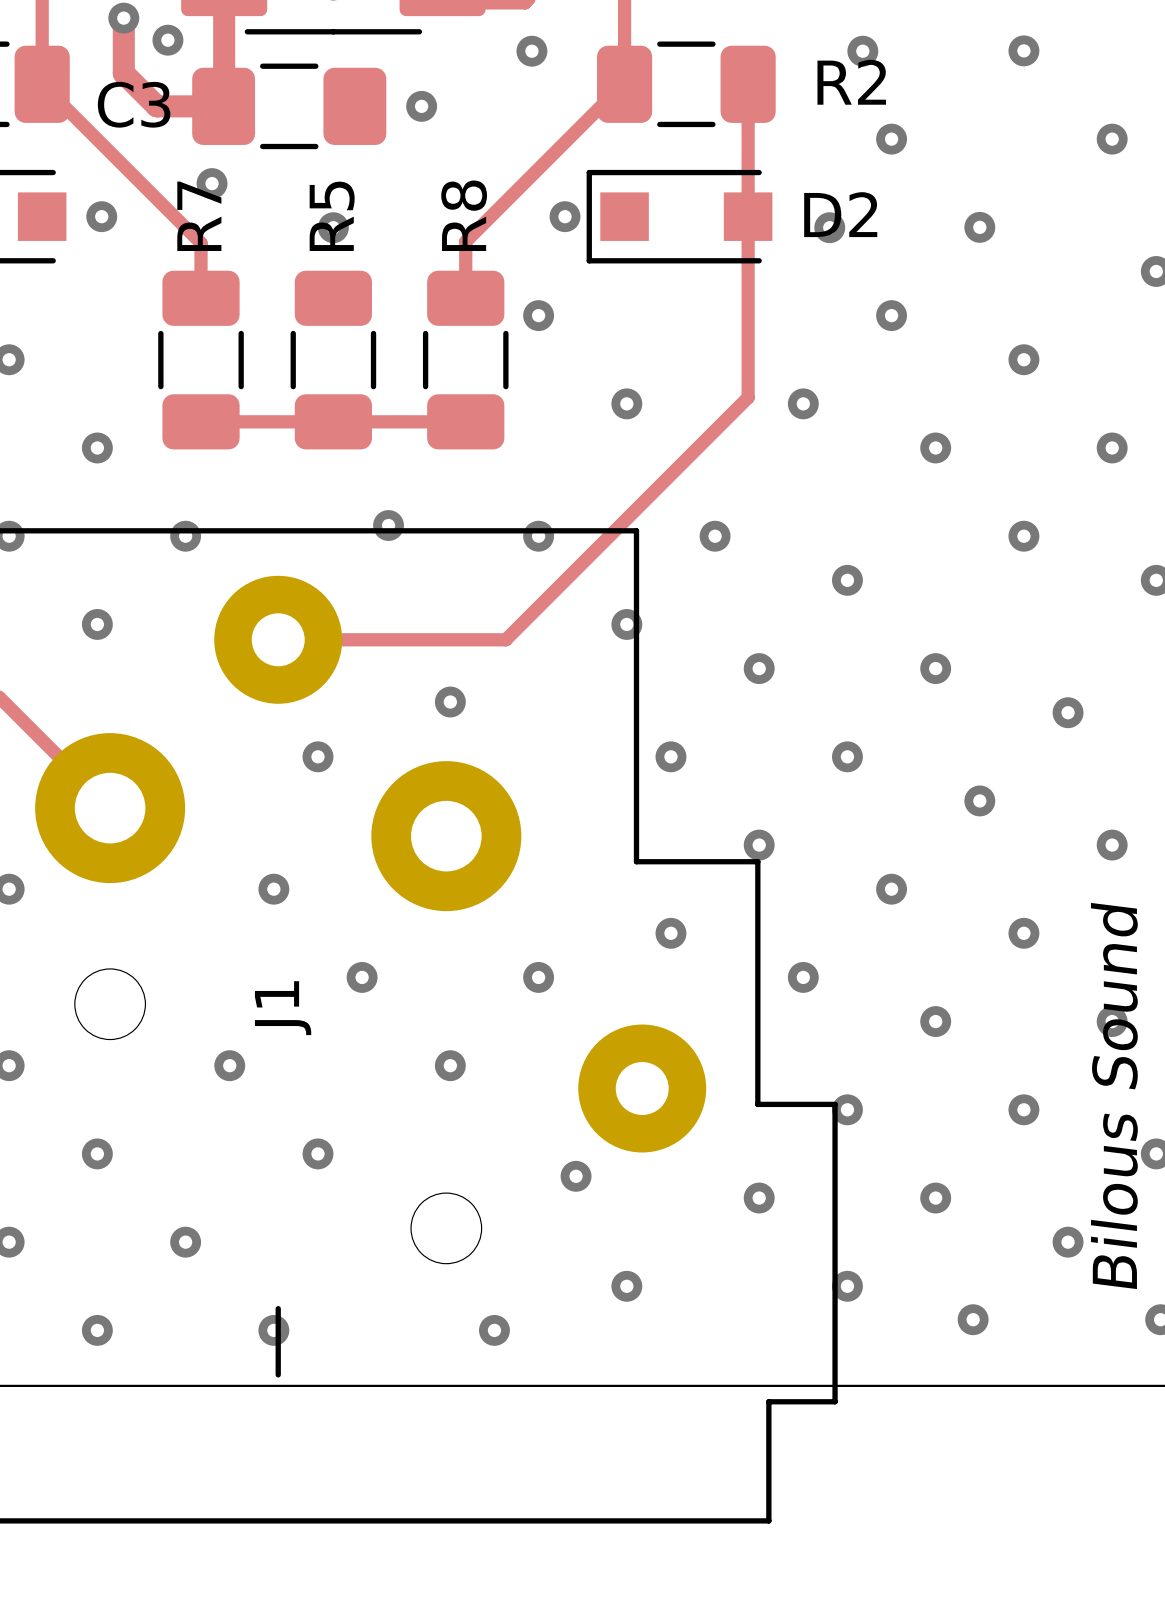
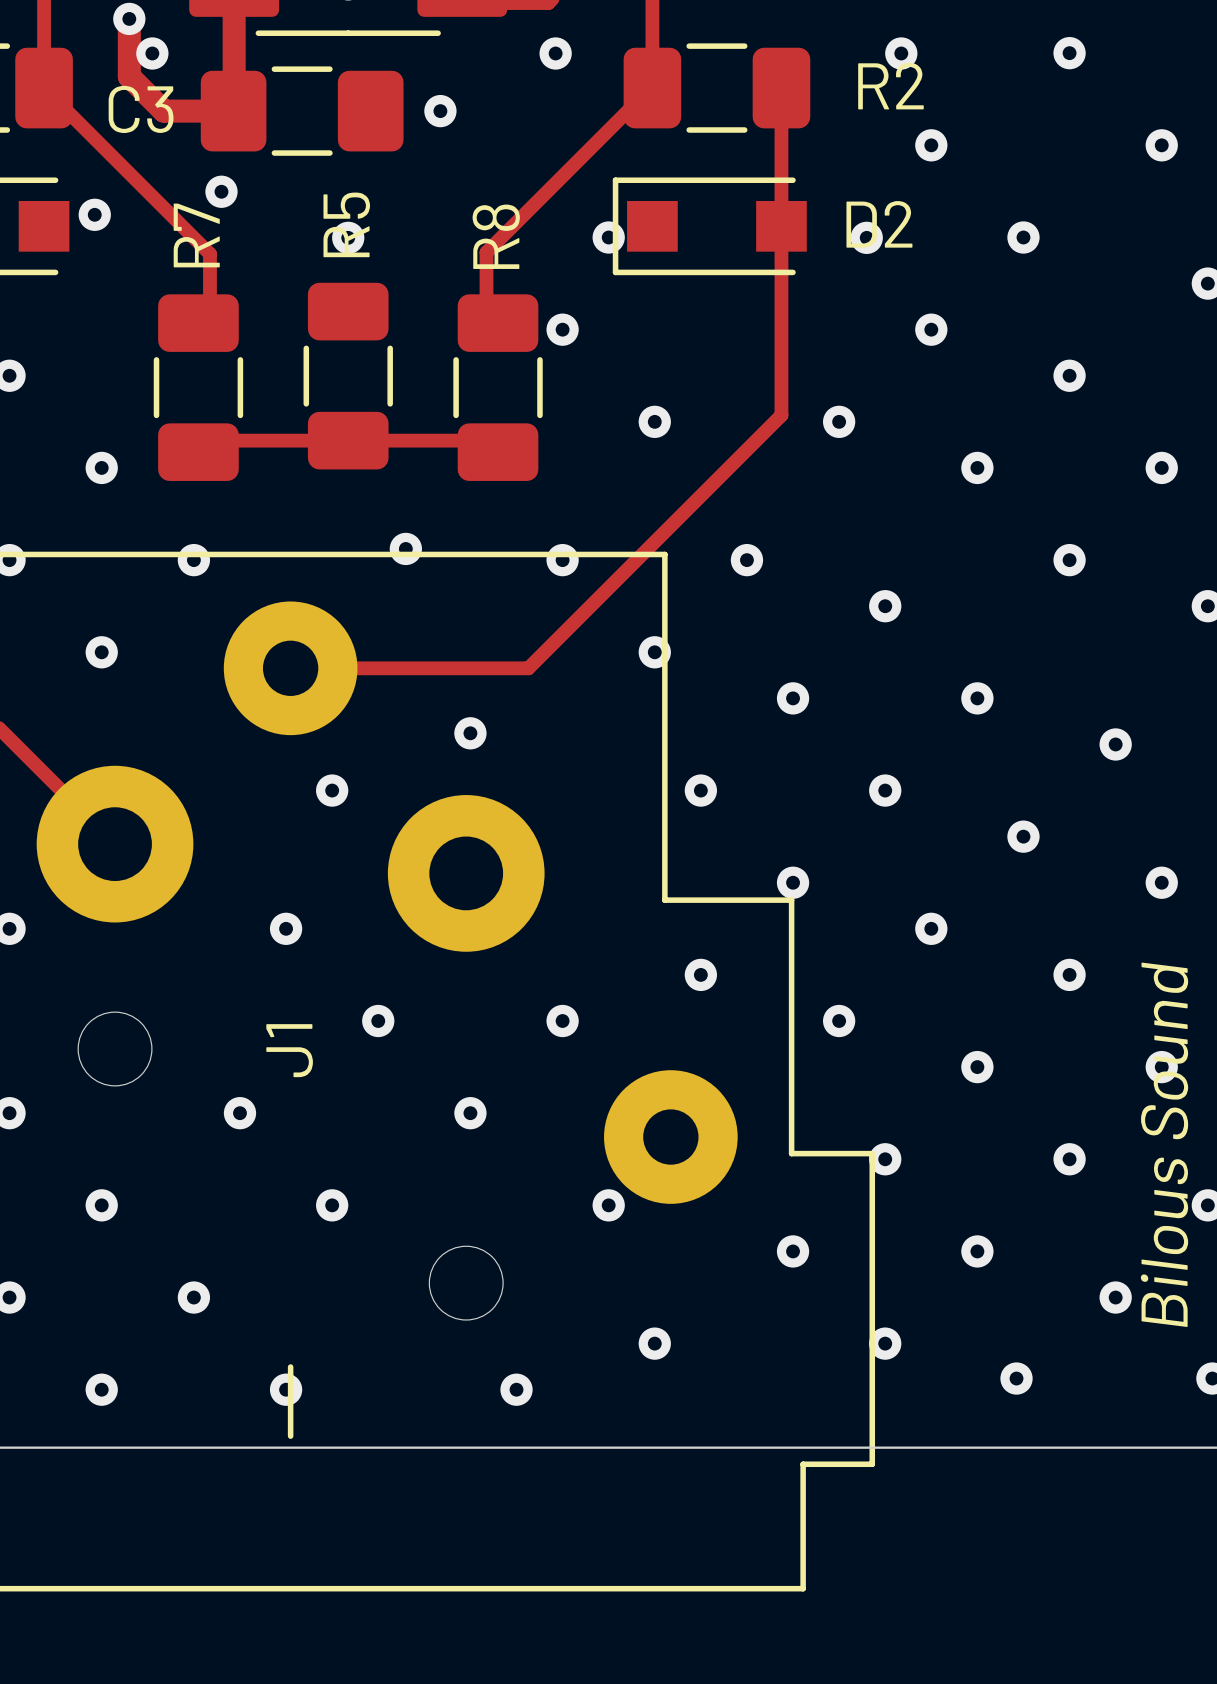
via position: (167, 40) -> (152, 53)
via position: (101, 216) -> (94, 214)
via position: (565, 216) -> (608, 237)
R7 position: (201, 360) -> (198, 387)
R8 position: (465, 360) -> (498, 387)
via position: (576, 1176) -> (608, 1205)

